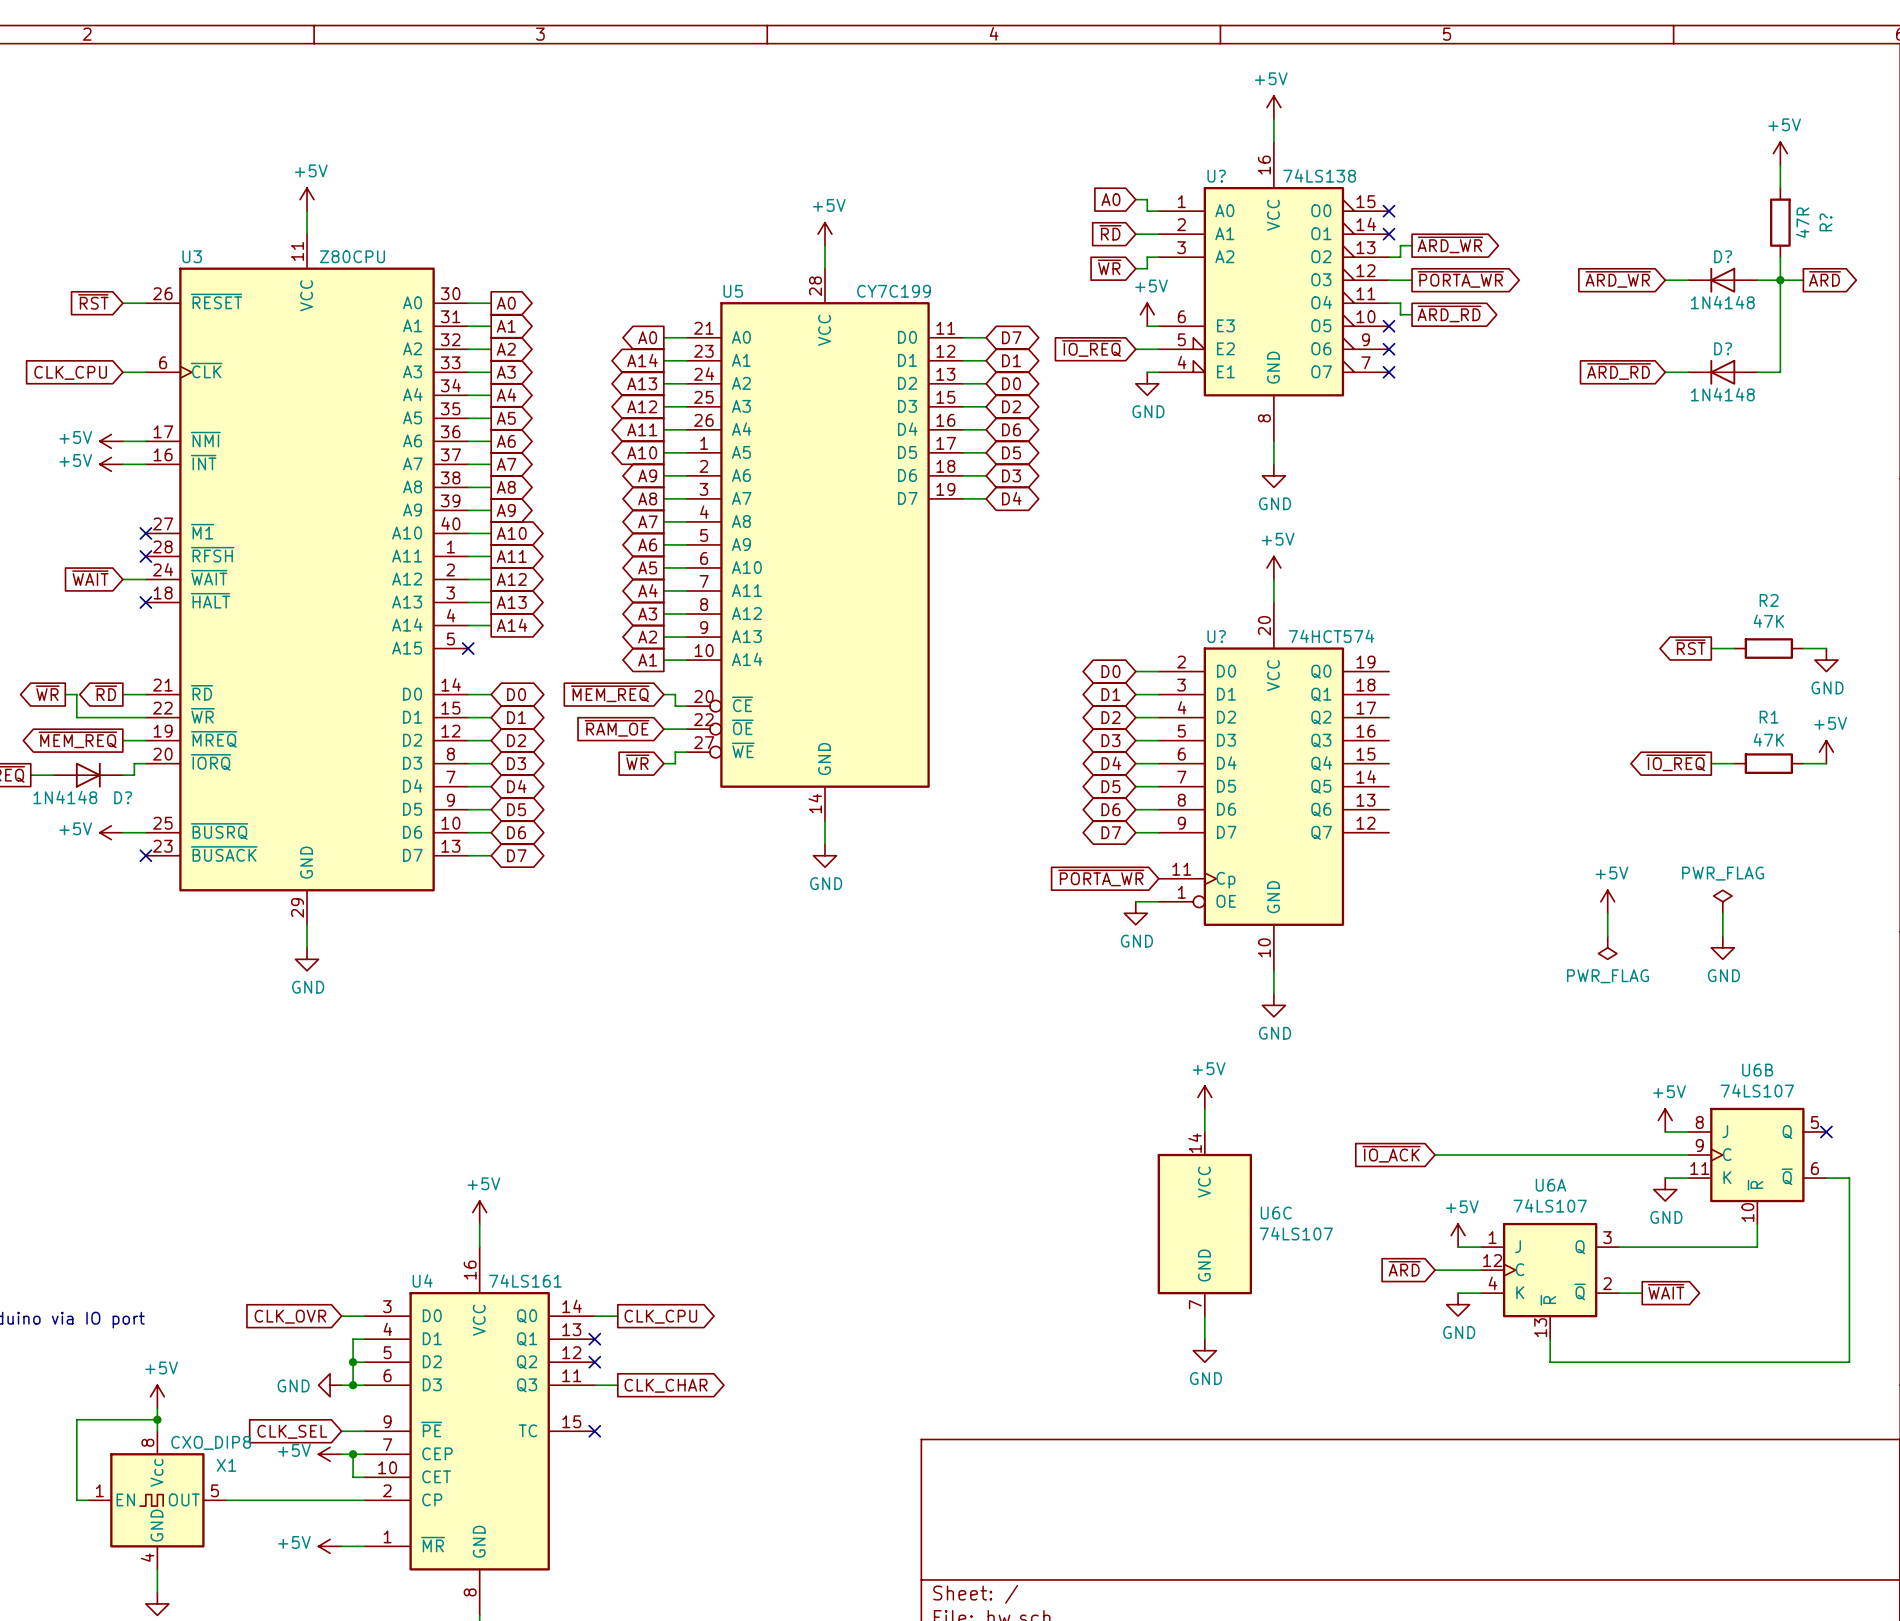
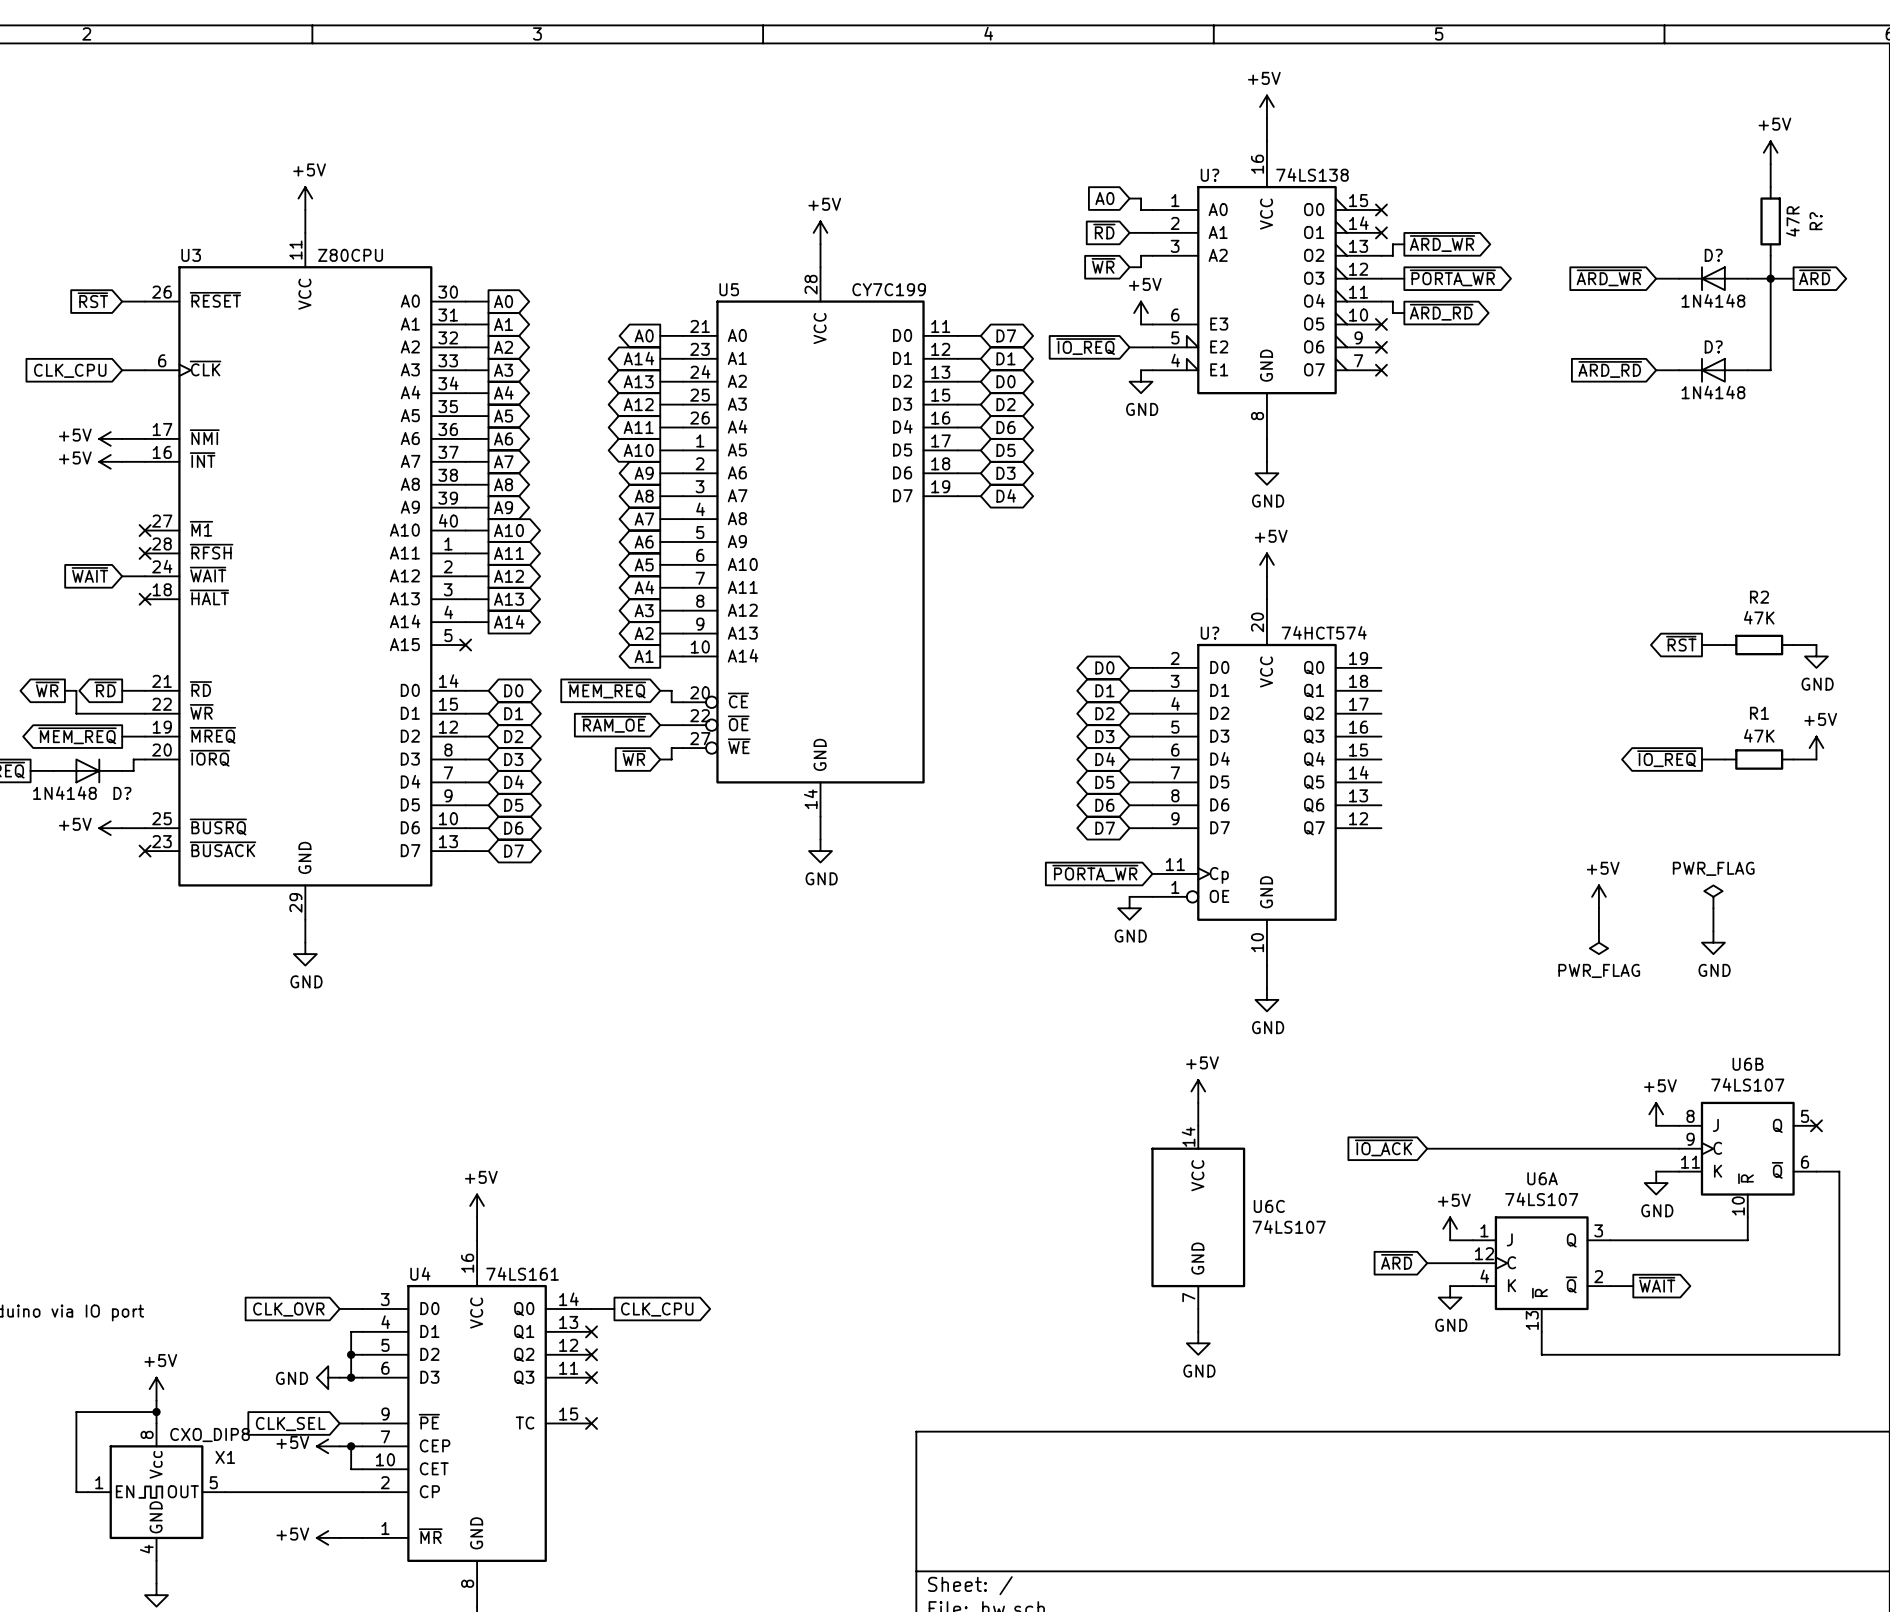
wire: (594, 1385) (617, 1385) -> none
no-connect mark: none -> (591, 1377)
global label: CLK_CHAR (666, 1385) -> none

